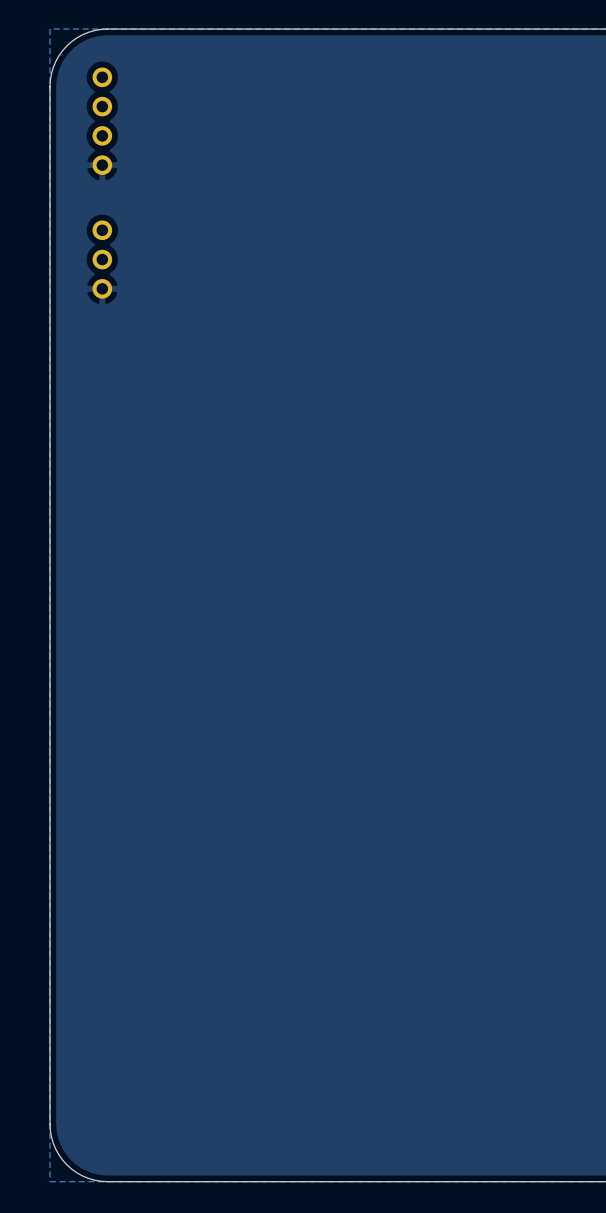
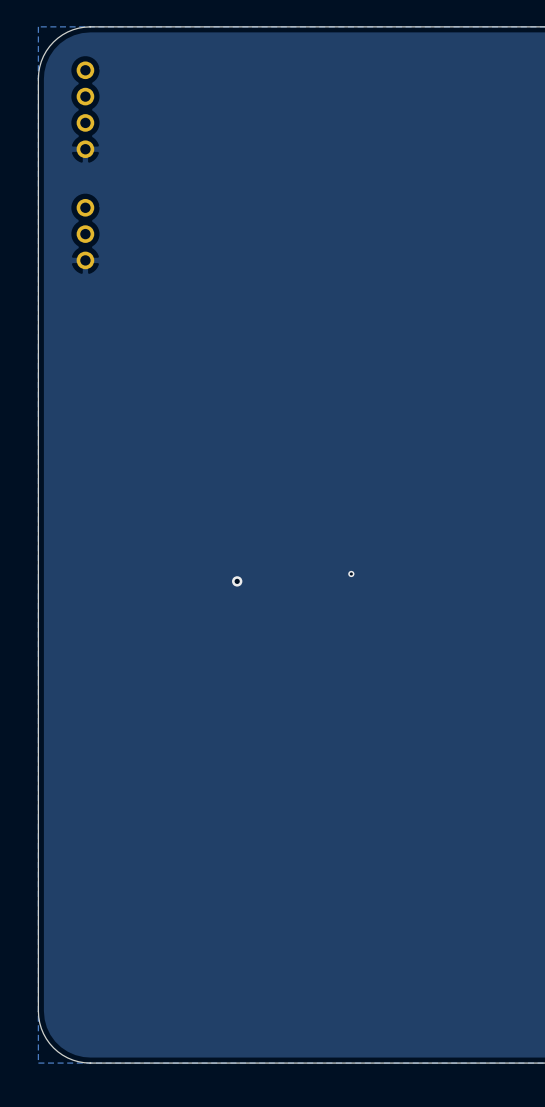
via: none -> (351, 573)
via: none -> (237, 581)

